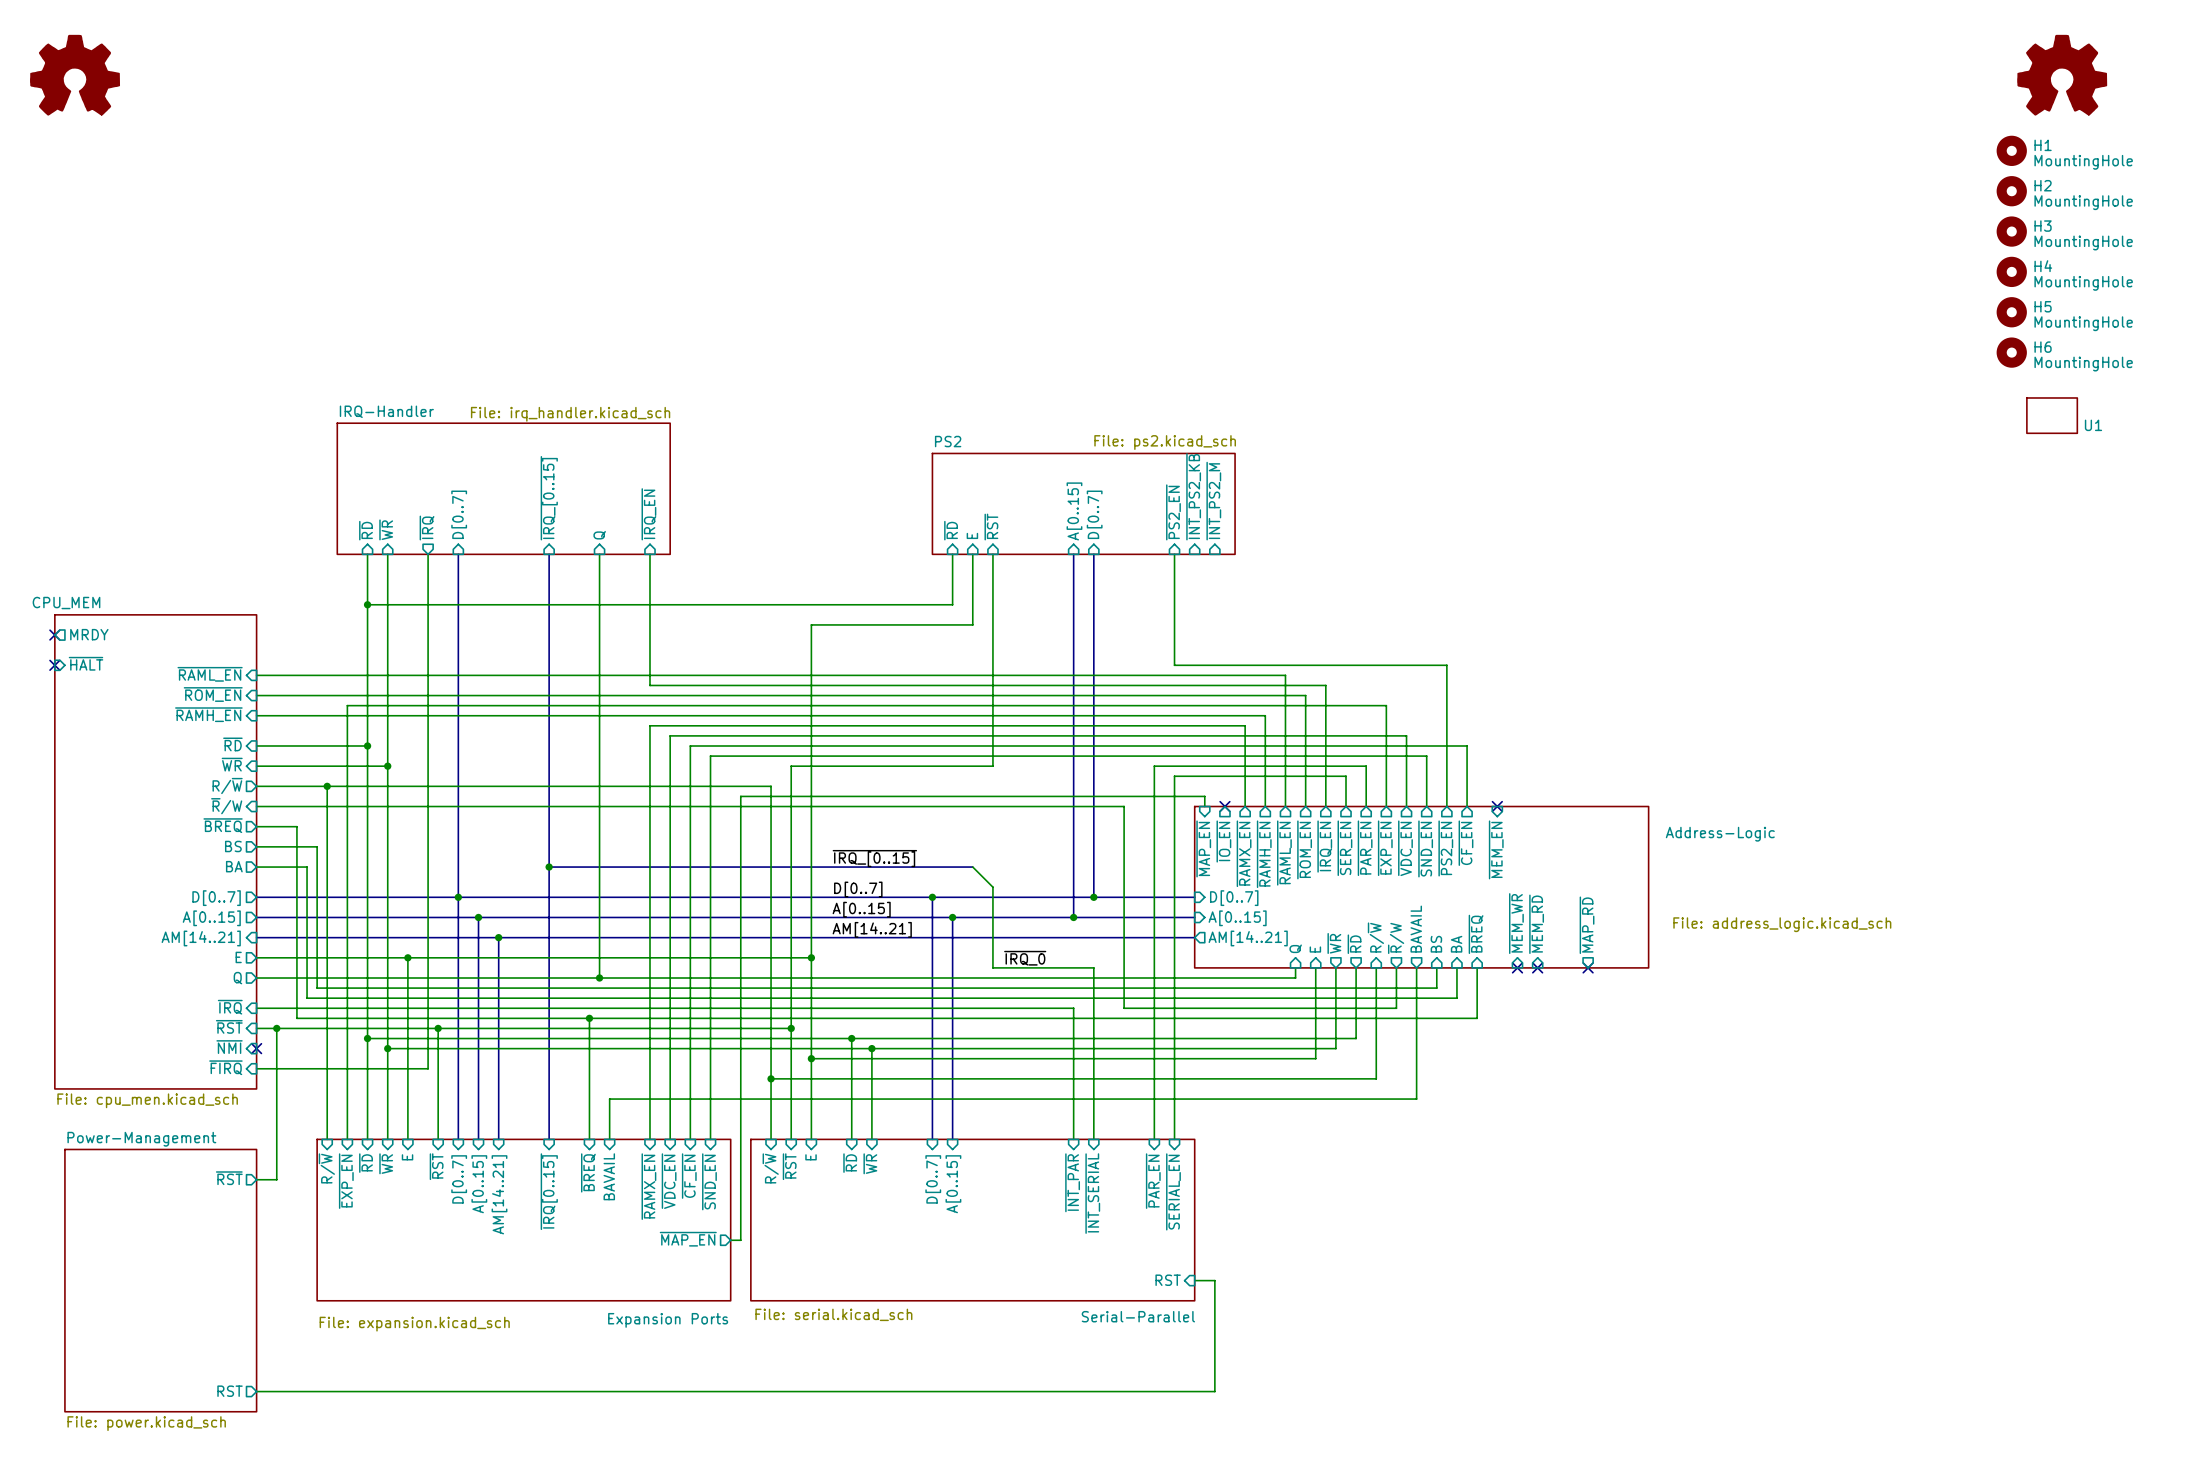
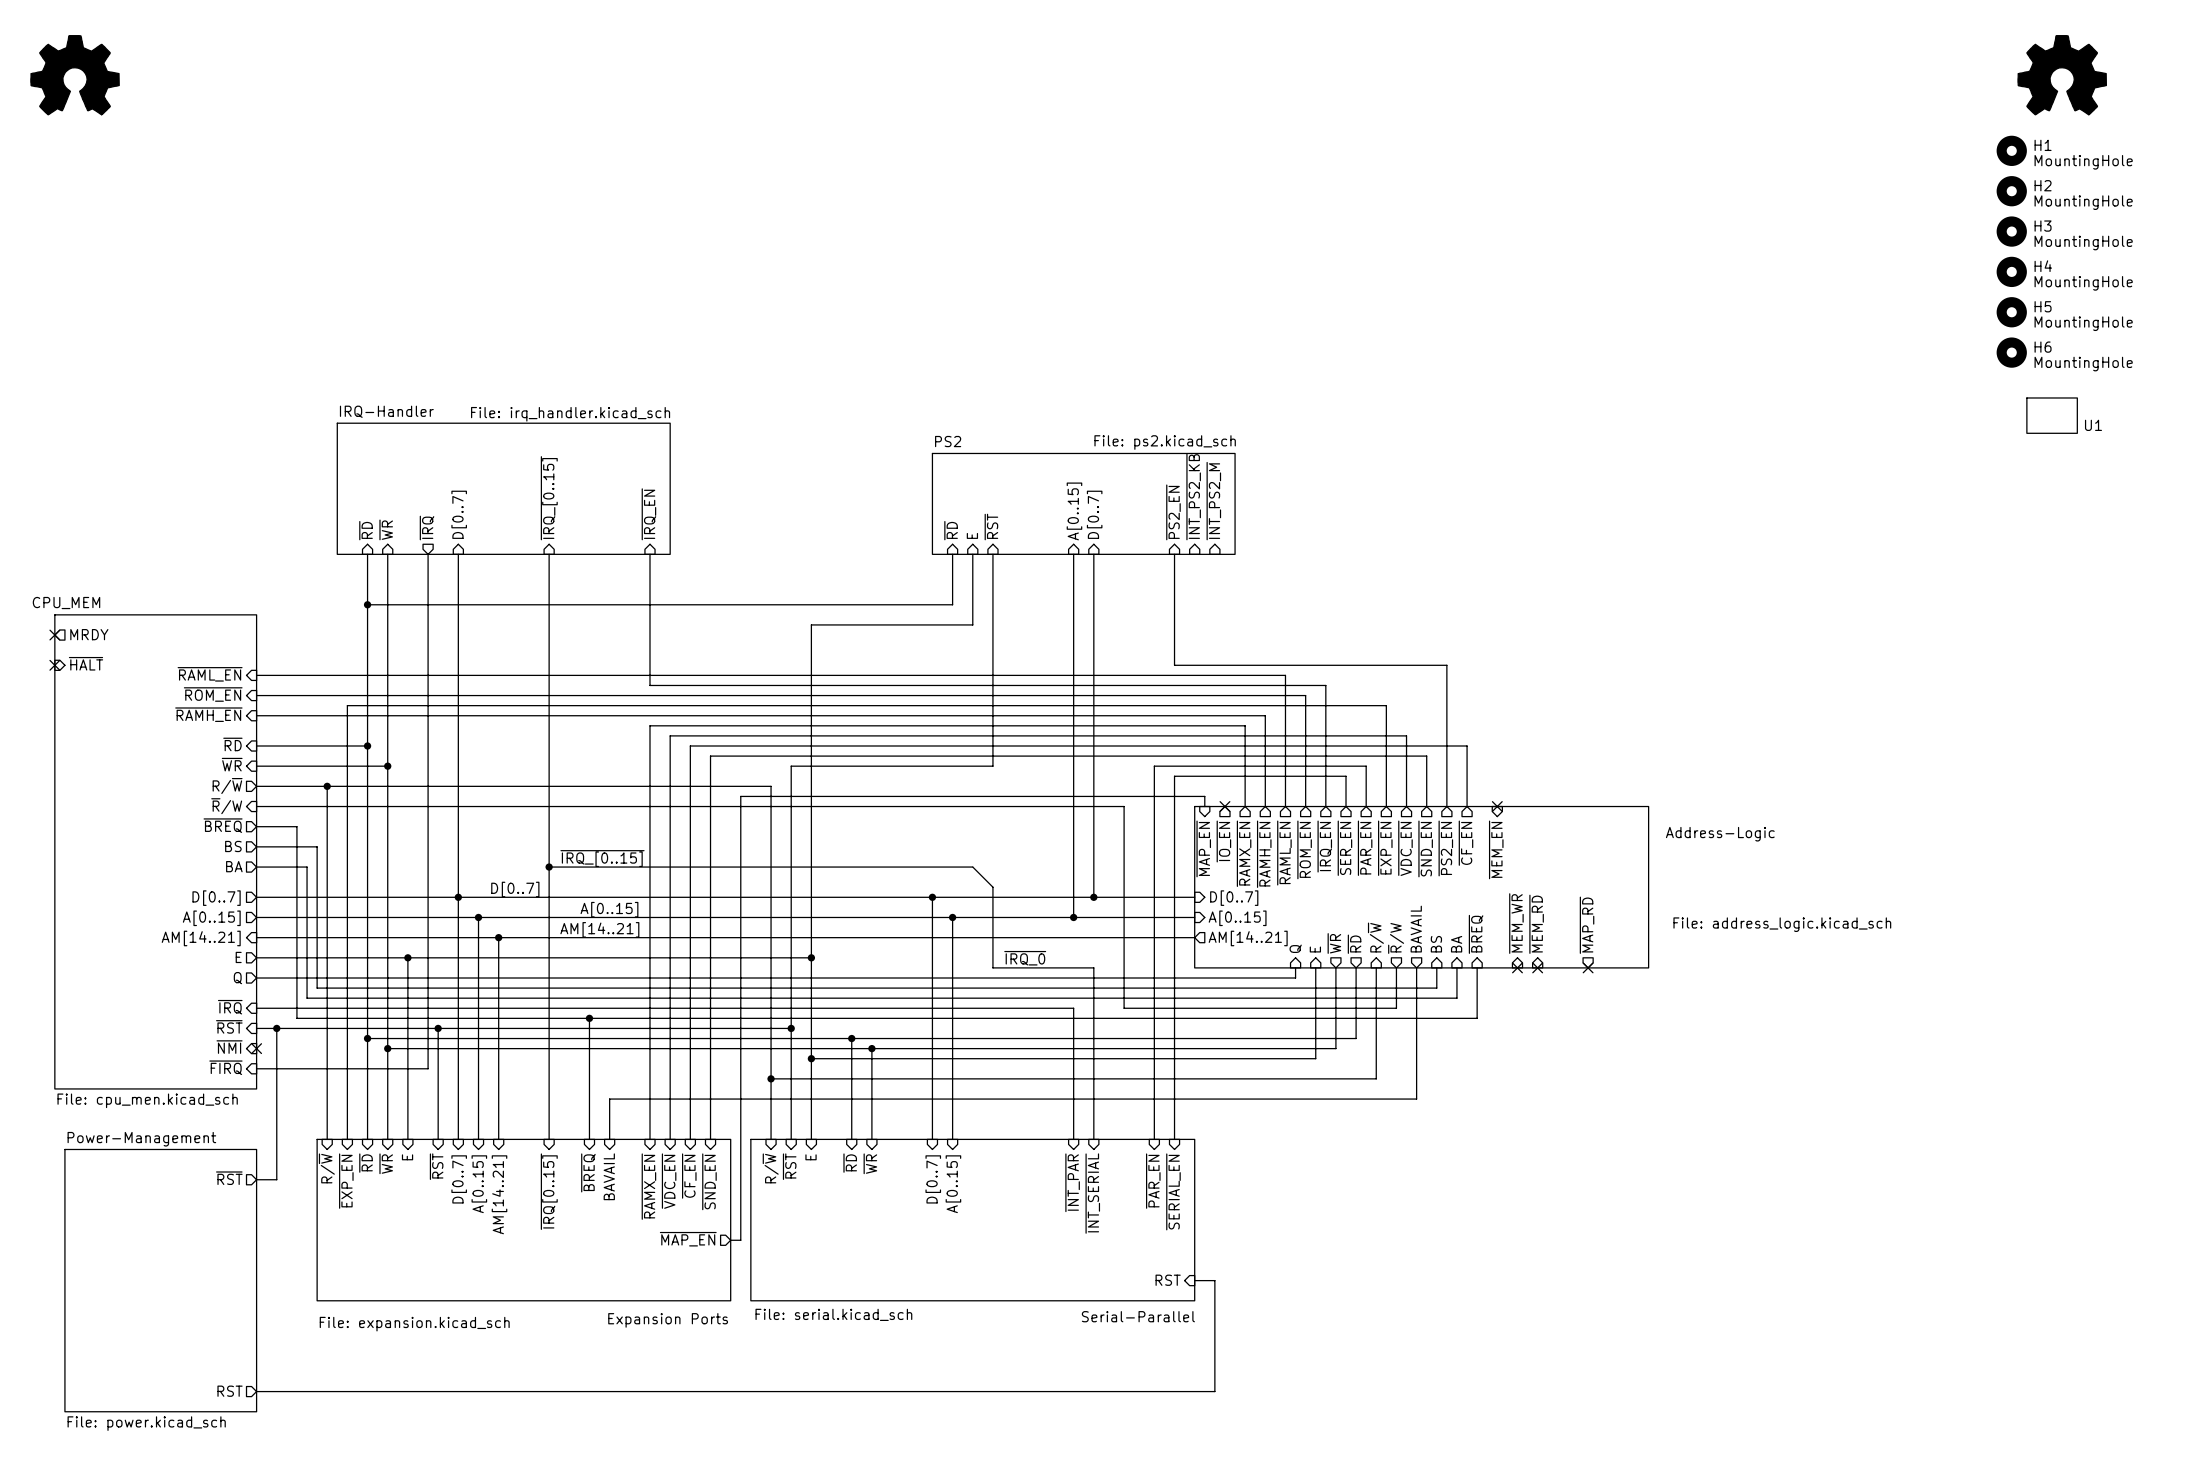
sheet pin: Q (599, 535) -> none
wire: (599, 554) (599, 978) -> none
label: none -> ~{IRQ_[0..15]} (602, 858)
label: ~{IRQ_[0..15]} (874, 858) -> none
label: none -> D[0..7] (515, 889)
label: D[0..7] (858, 889) -> none
label: none -> A[0..15] (609, 909)
label: A[0..15] (861, 909) -> none
label: none -> AM[14..21] (599, 929)
label: AM[14..21] (872, 929) -> none
junction: (599, 978) -> none

